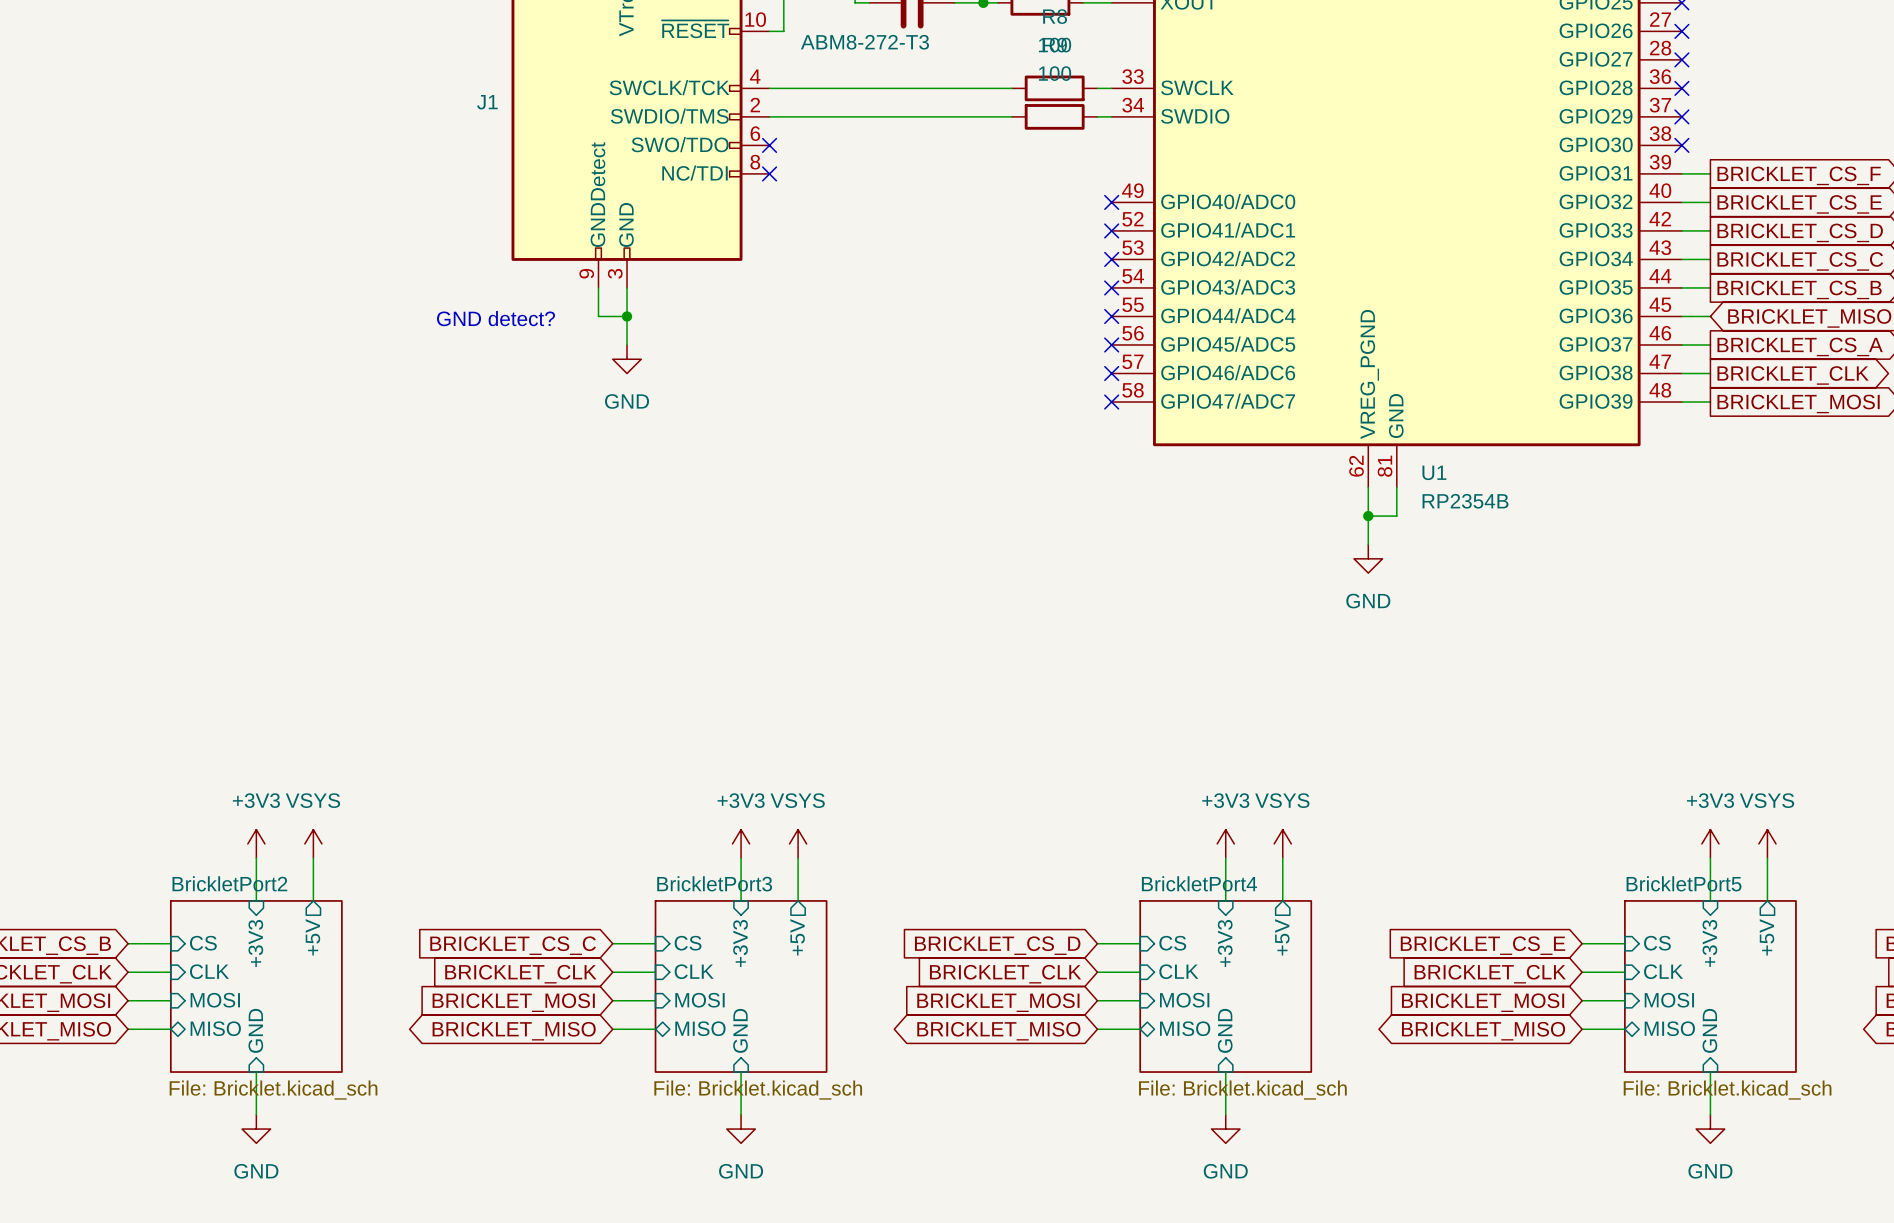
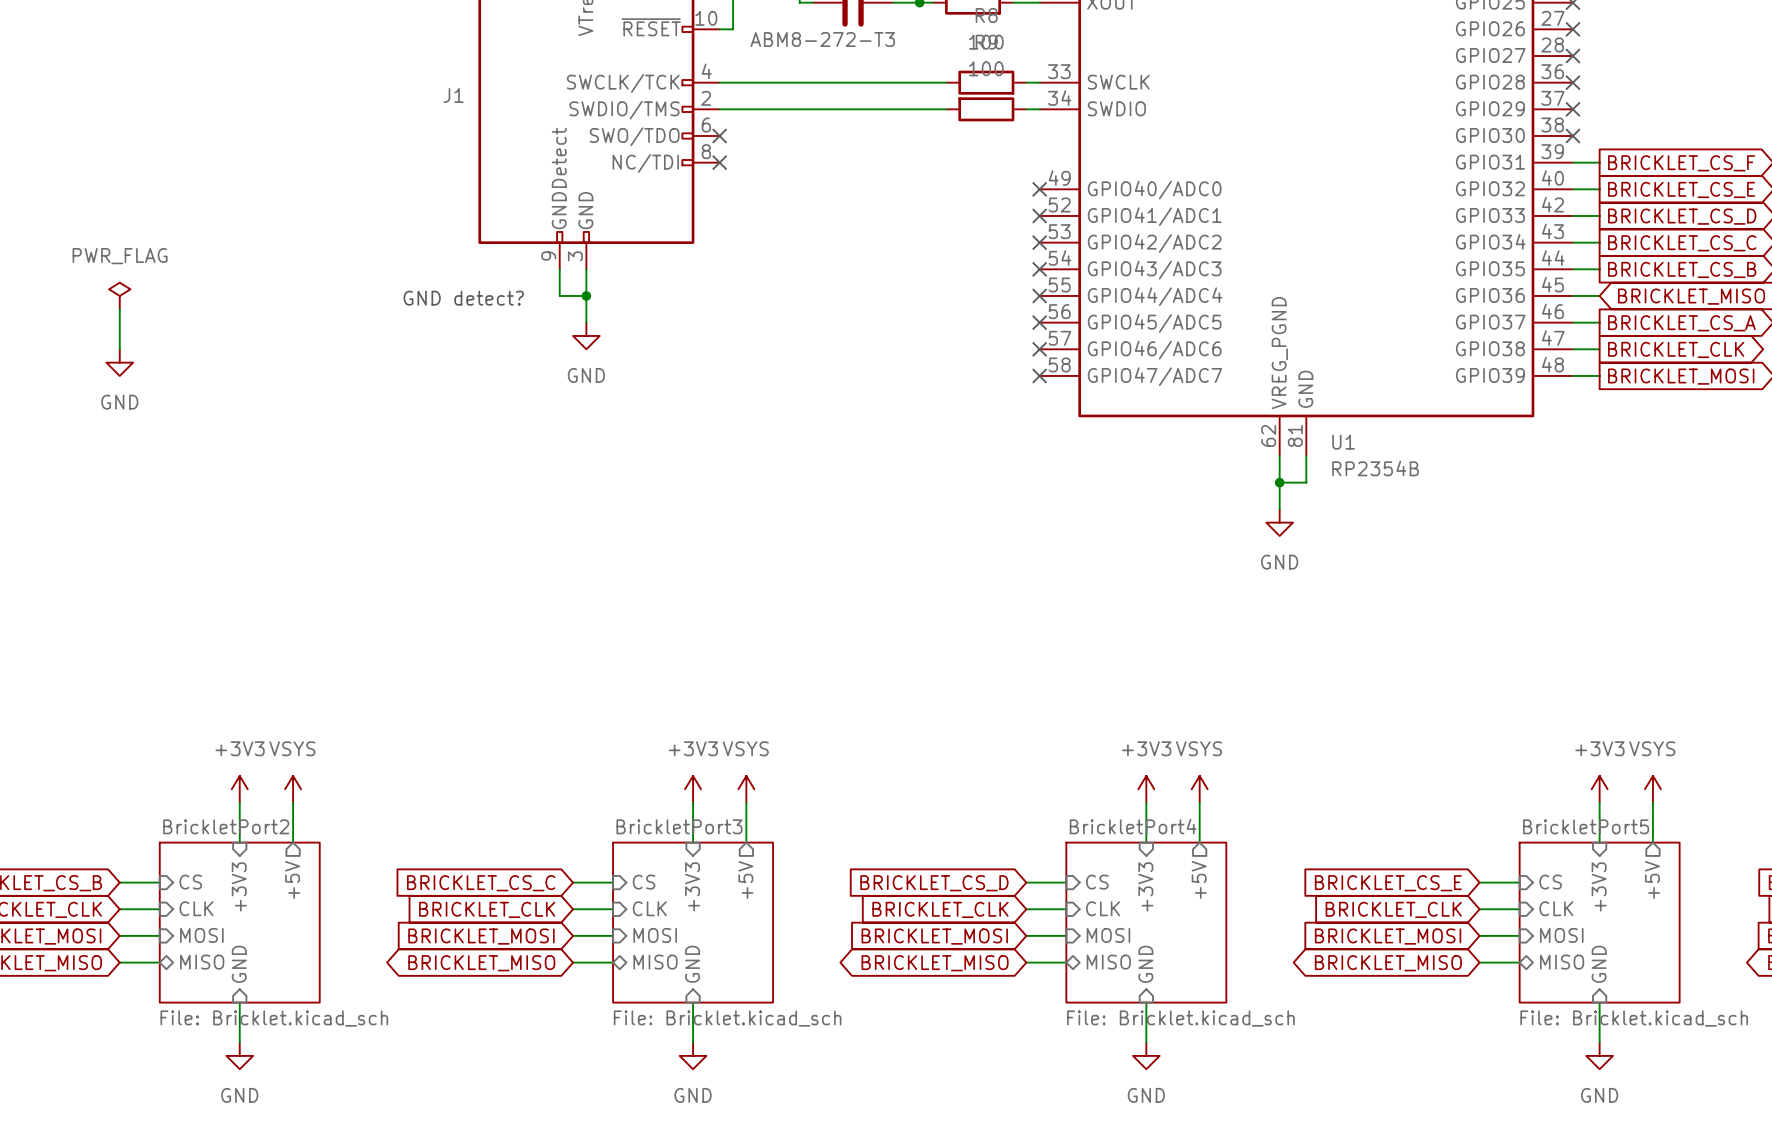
power symbol: none -> PWR_FLAG (119, 295)
wire: none -> (119, 309) (119, 349)
power symbol: none -> GND (119, 362)

